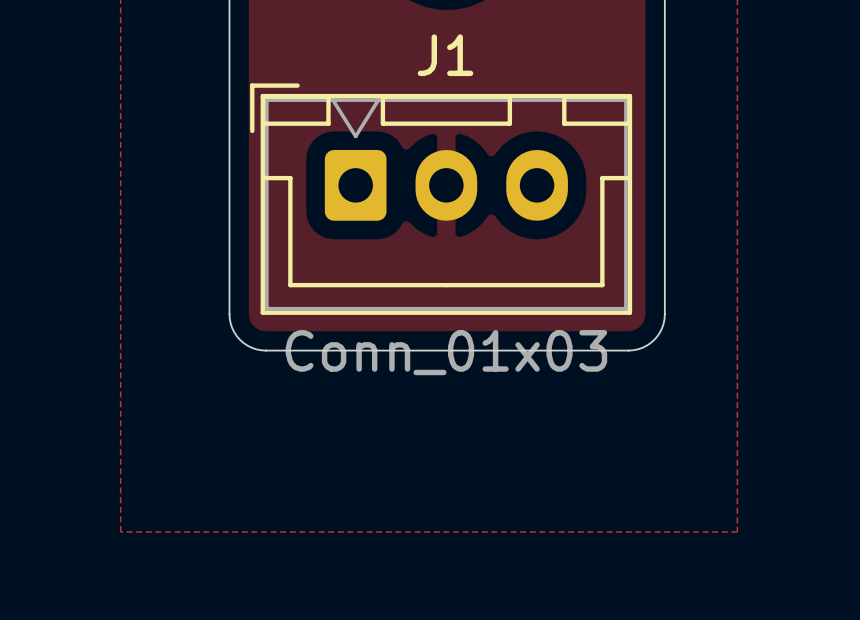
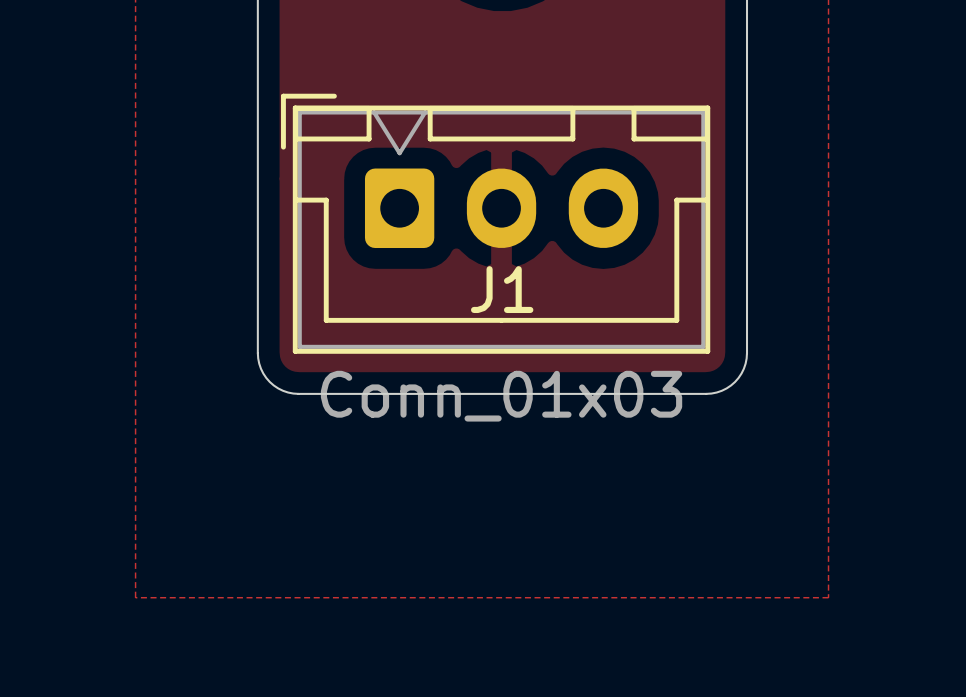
J1 name position: J1 (445, 55) -> J1 (502, 289)

